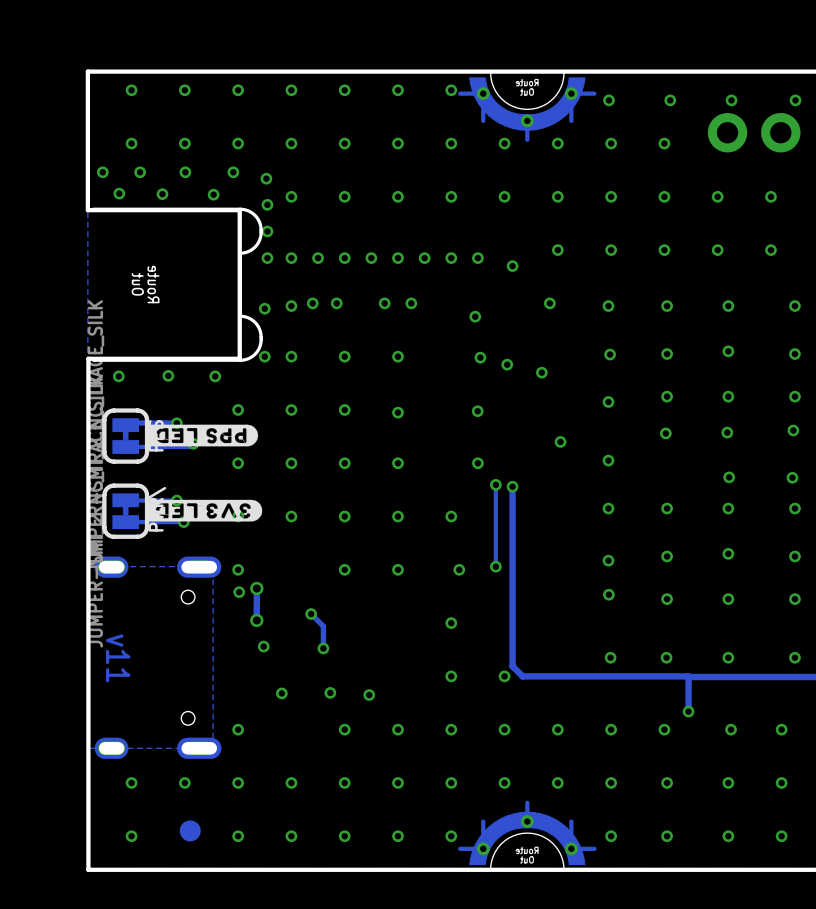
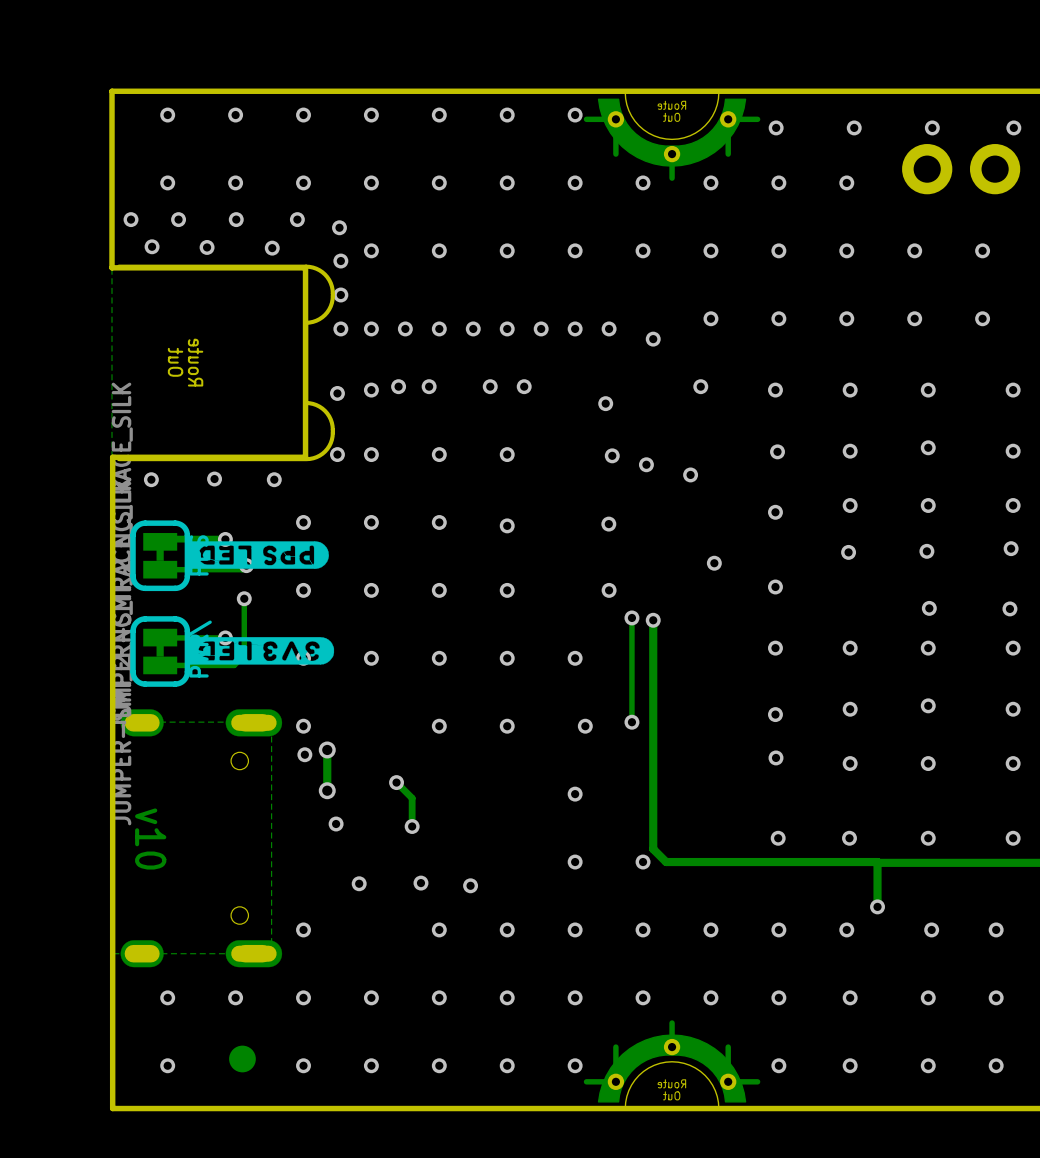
track: none -> (244, 598) (244, 655) (234, 665)
via position: (183, 522) -> (244, 598)
text: v11 (118, 658) -> v10 (150, 839)

